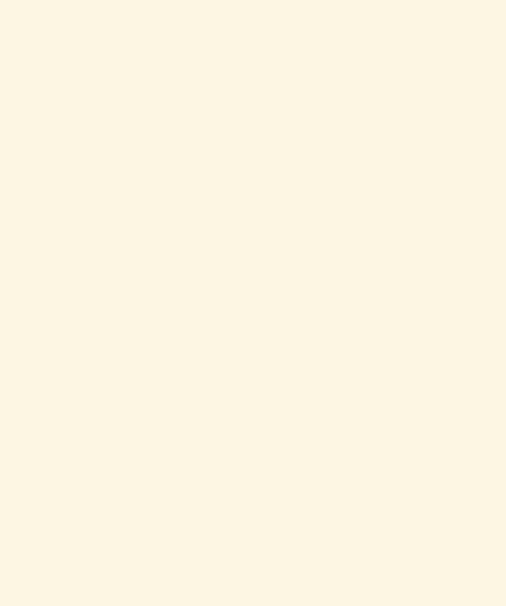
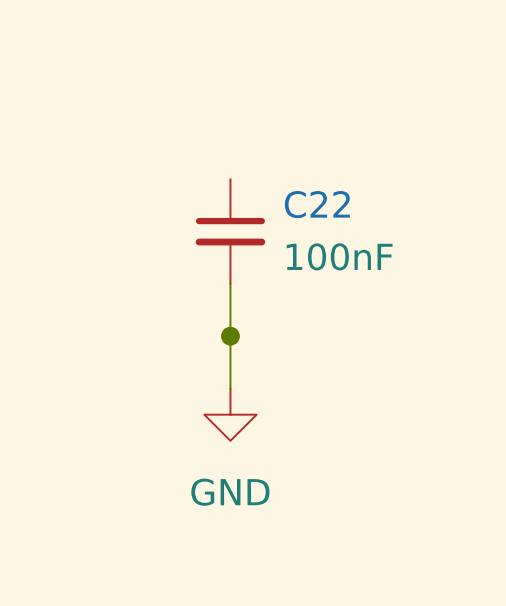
C22: none -> 100nF (230, 231)
wire: none -> (230, 283) (230, 388)
junction: none -> (230, 336)
power symbol: none -> GND (230, 414)

